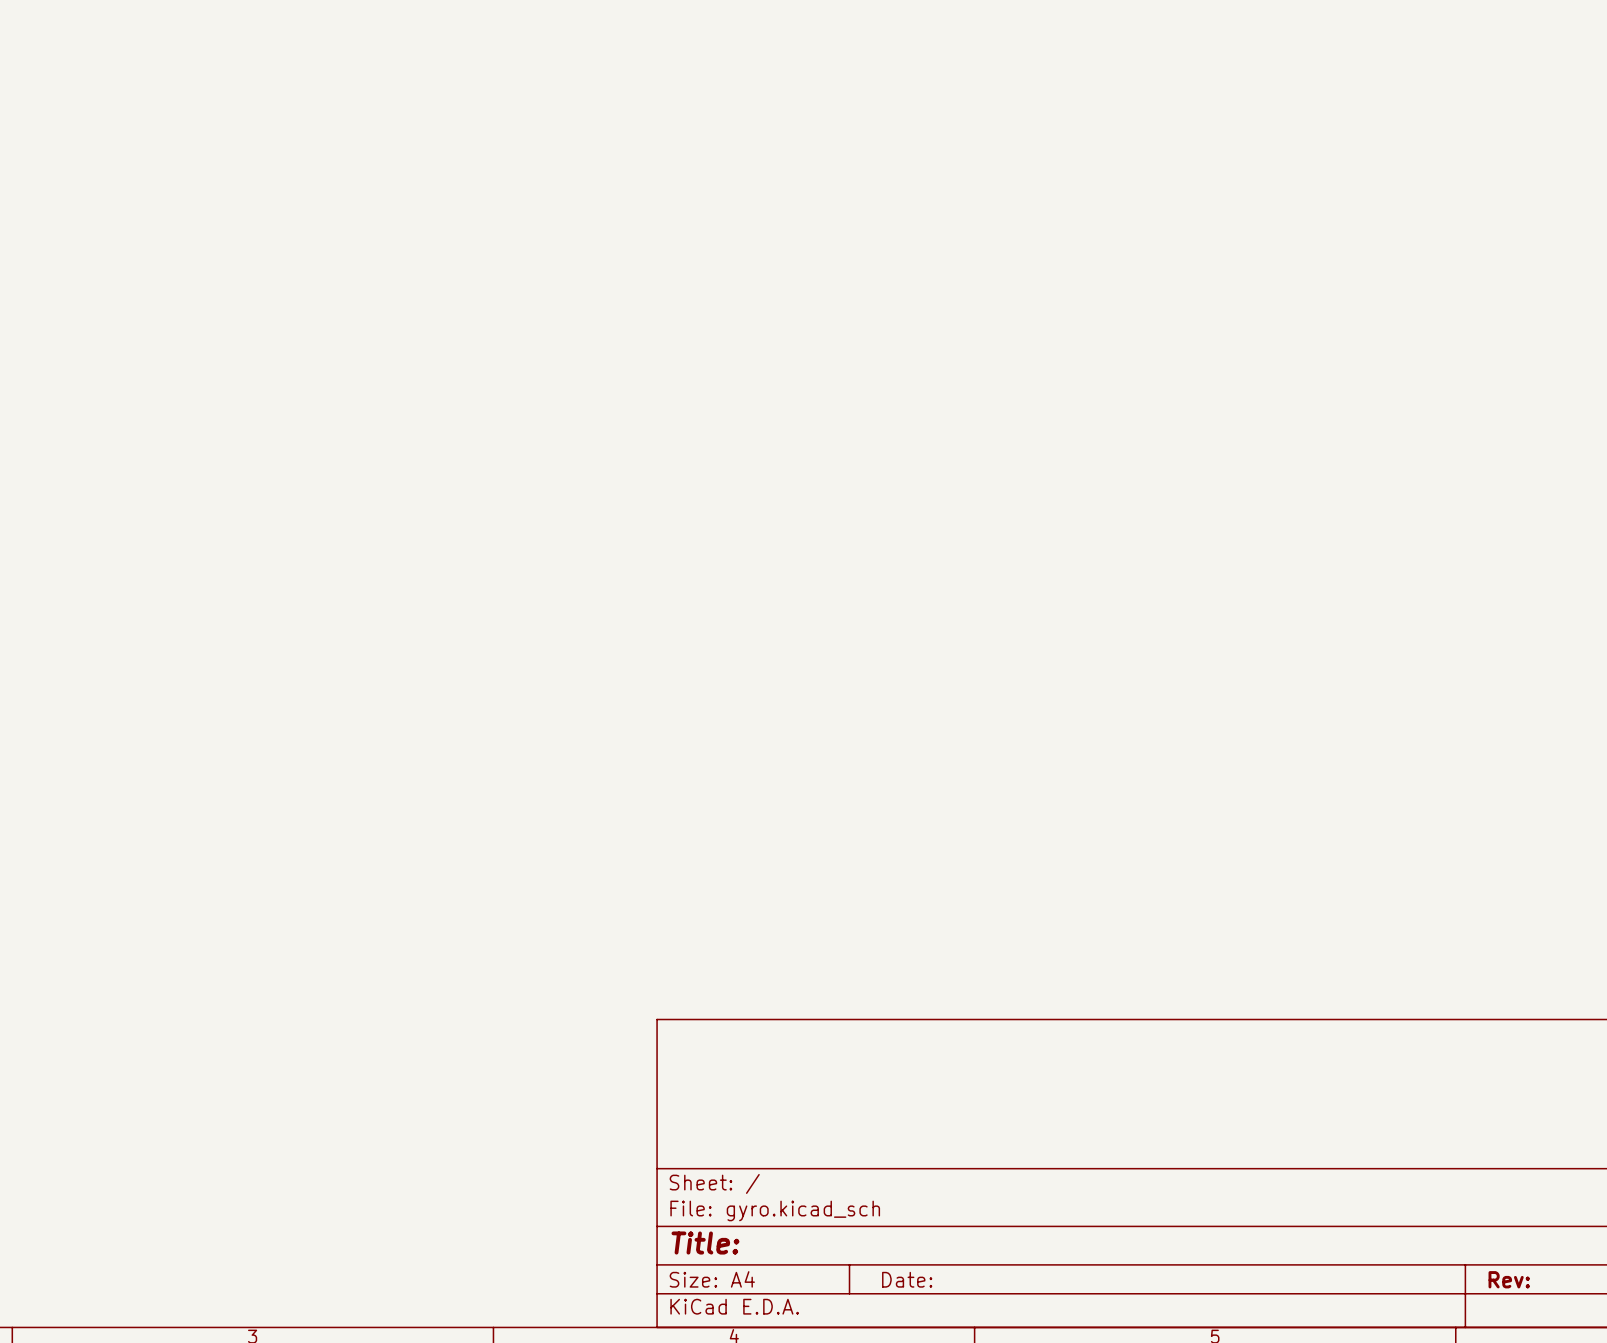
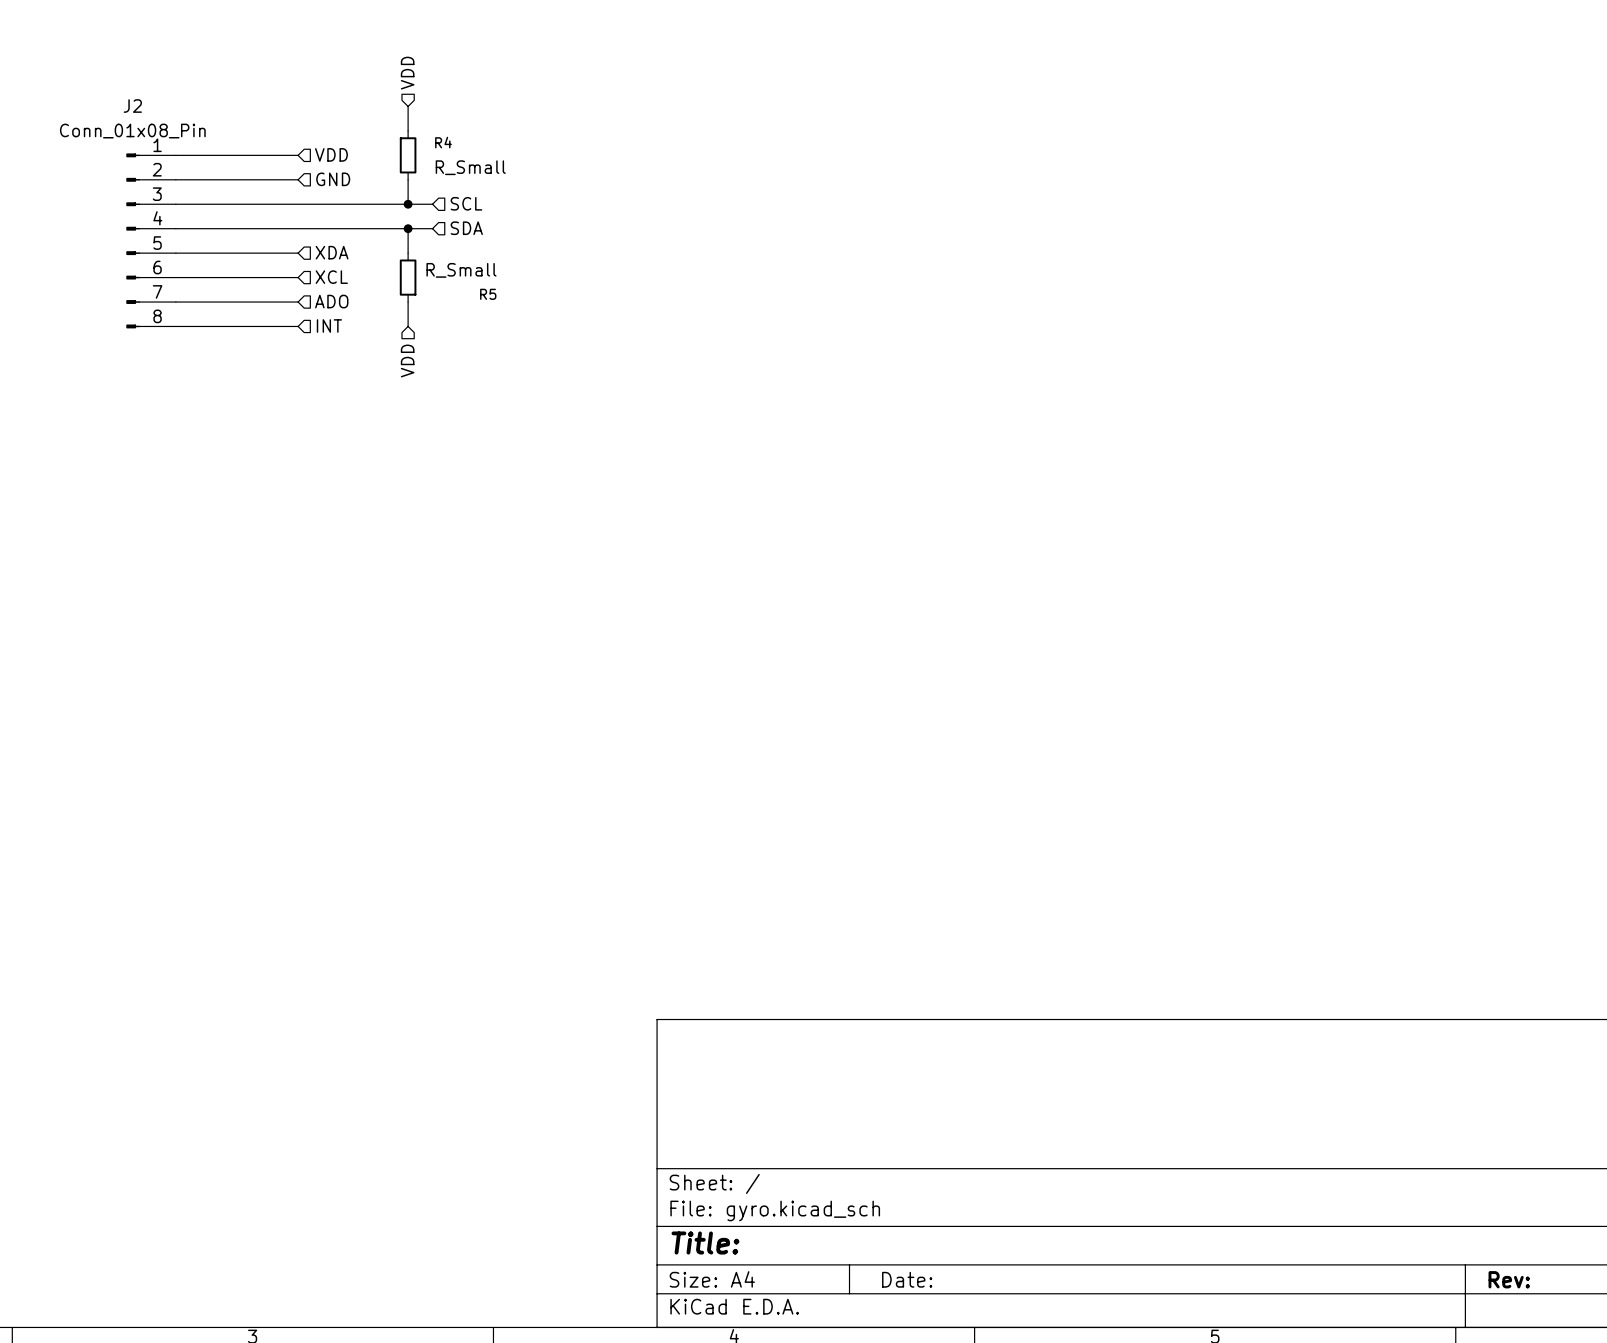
hierarchical label: none -> VDD (407, 73)
wire: none -> (408, 106) (408, 130)
hierarchical label: none -> VDD (331, 154)
wire: none -> (175, 155) (298, 155)
R4: none -> R_Small (408, 155)
wire: none -> (175, 179) (298, 179)
hierarchical label: none -> GND (333, 179)
wire: none -> (408, 179) (408, 204)
hierarchical label: none -> SCL (466, 203)
wire: none -> (175, 204) (432, 204)
junction: none -> (408, 204)
wire: none -> (175, 228) (432, 228)
wire: none -> (408, 228) (408, 253)
junction: none -> (408, 228)
hierarchical label: none -> SDA (466, 228)
J2: none -> Conn_01x08_Pin (151, 240)
hierarchical label: none -> XDA (332, 252)
wire: none -> (175, 253) (298, 253)
wire: none -> (175, 277) (298, 277)
hierarchical label: none -> XCL (331, 277)
R5: none -> R_Small (408, 277)
hierarchical label: none -> ADO (331, 301)
wire: none -> (175, 302) (298, 302)
wire: none -> (408, 302) (408, 326)
wire: none -> (175, 326) (298, 326)
hierarchical label: none -> INT (329, 326)
hierarchical label: none -> VDD (407, 360)

